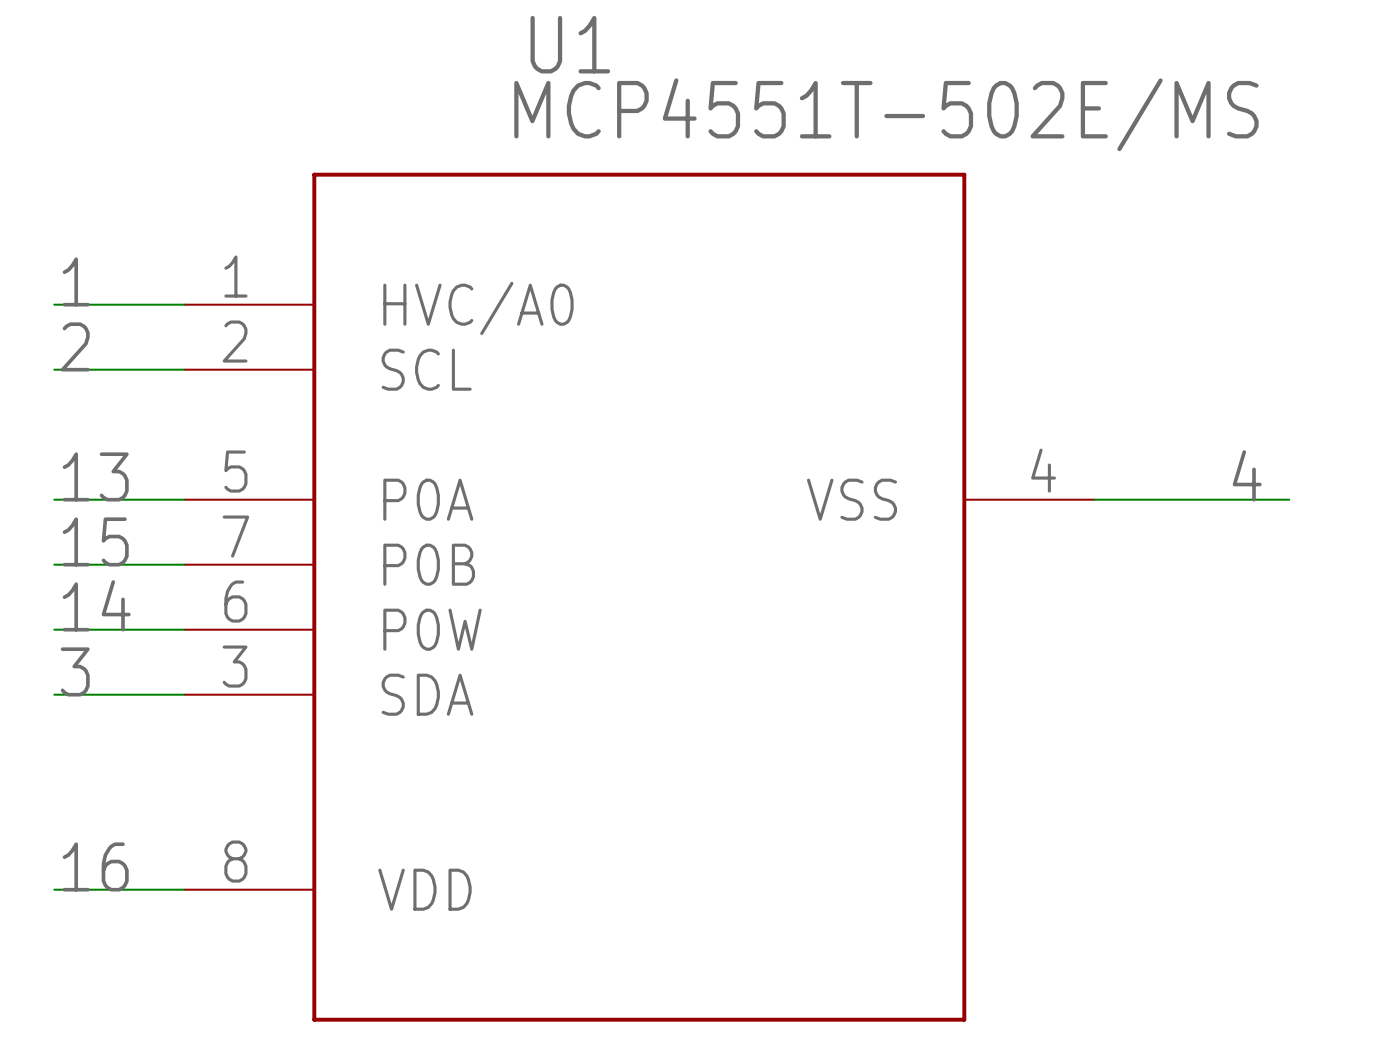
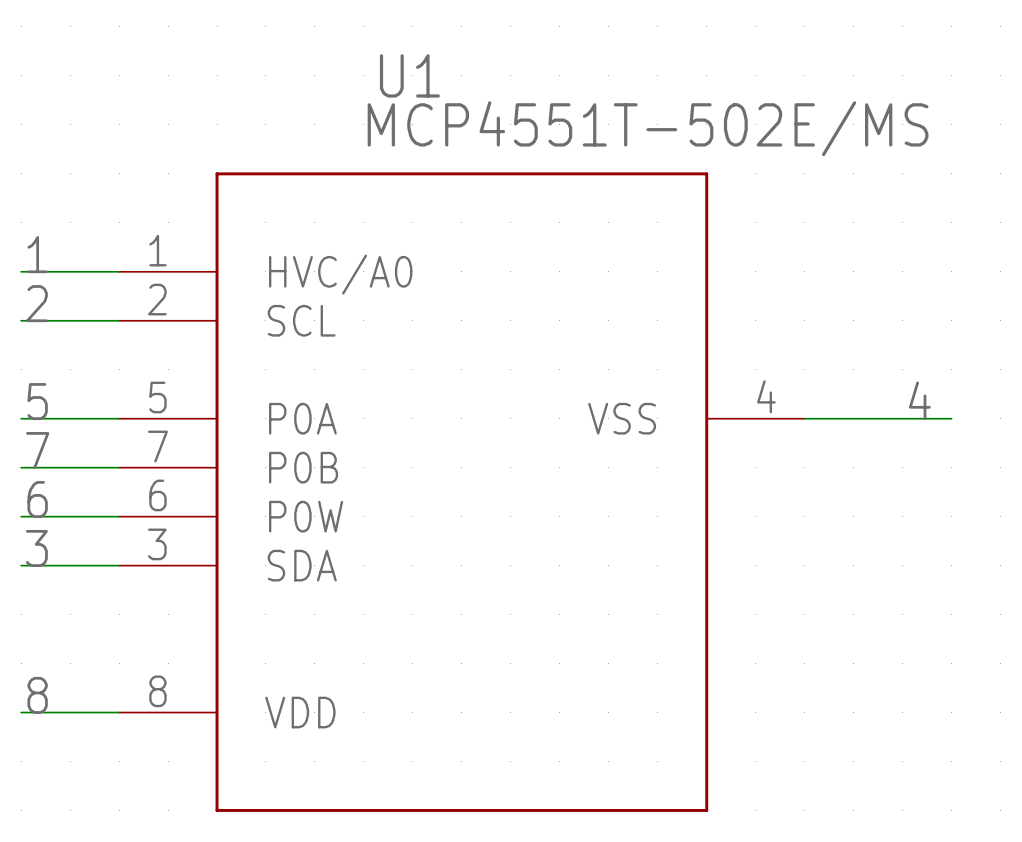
label: 13 (95, 476) -> 5 (37, 401)
label: 15 (95, 541) -> 7 (37, 450)
label: 14 (96, 605) -> 6 (37, 499)
label: 16 (95, 866) -> 8 (37, 695)

